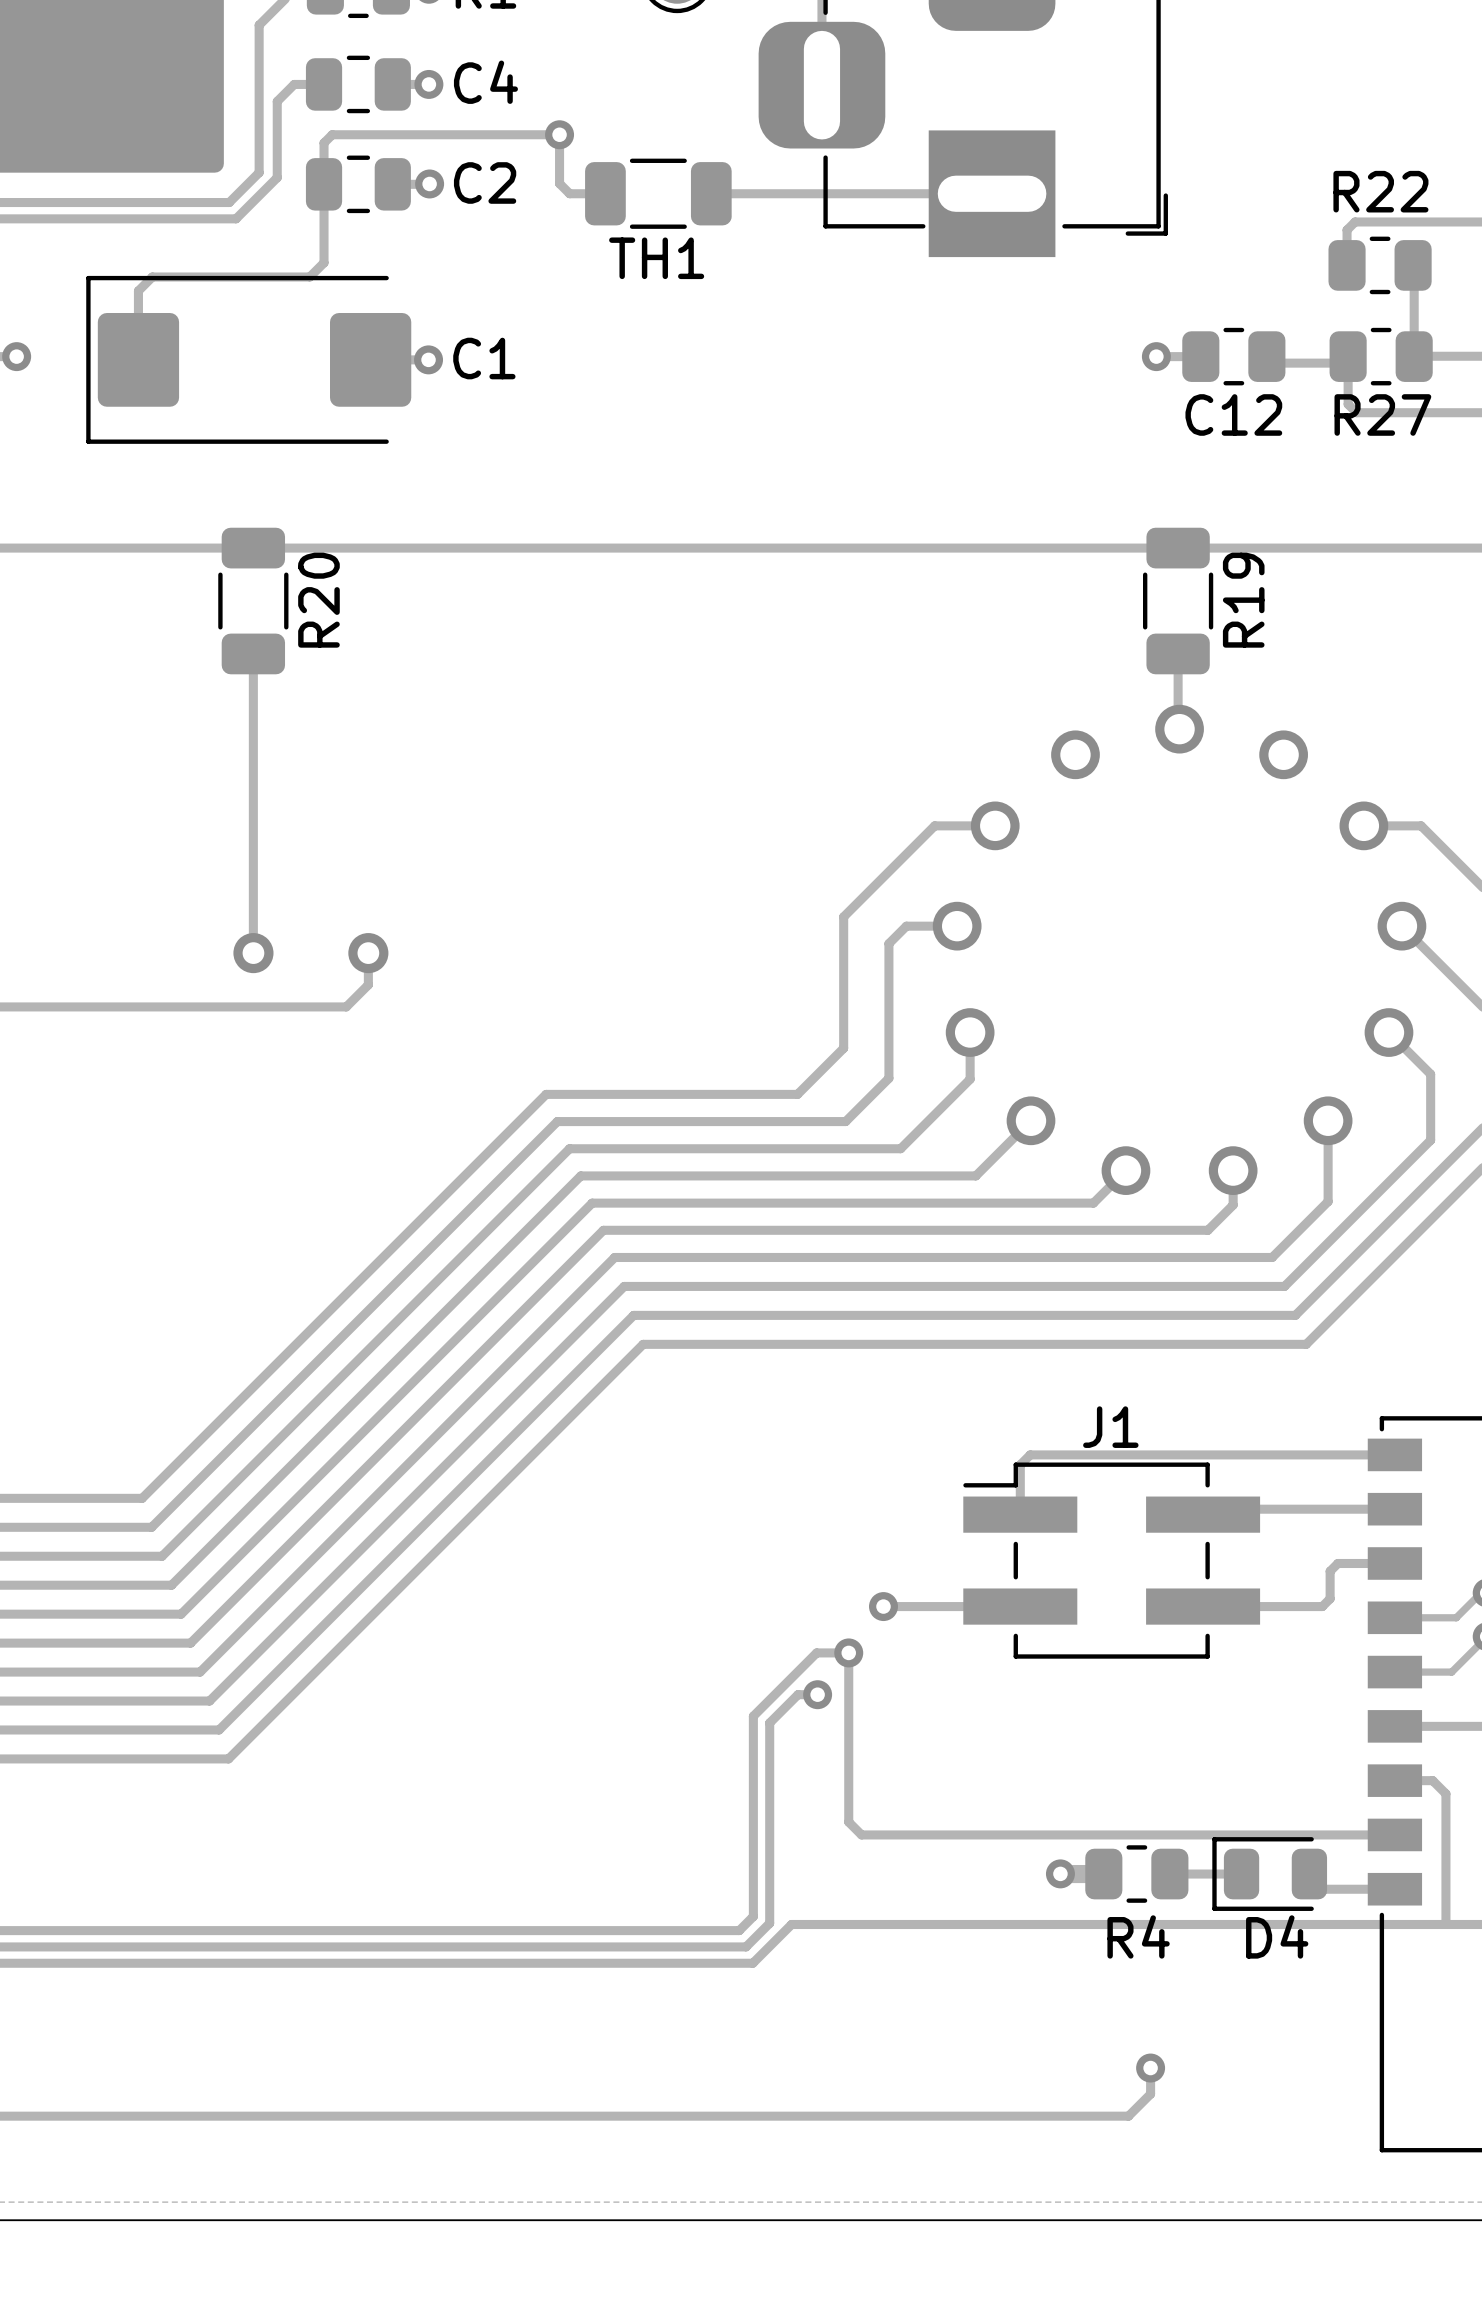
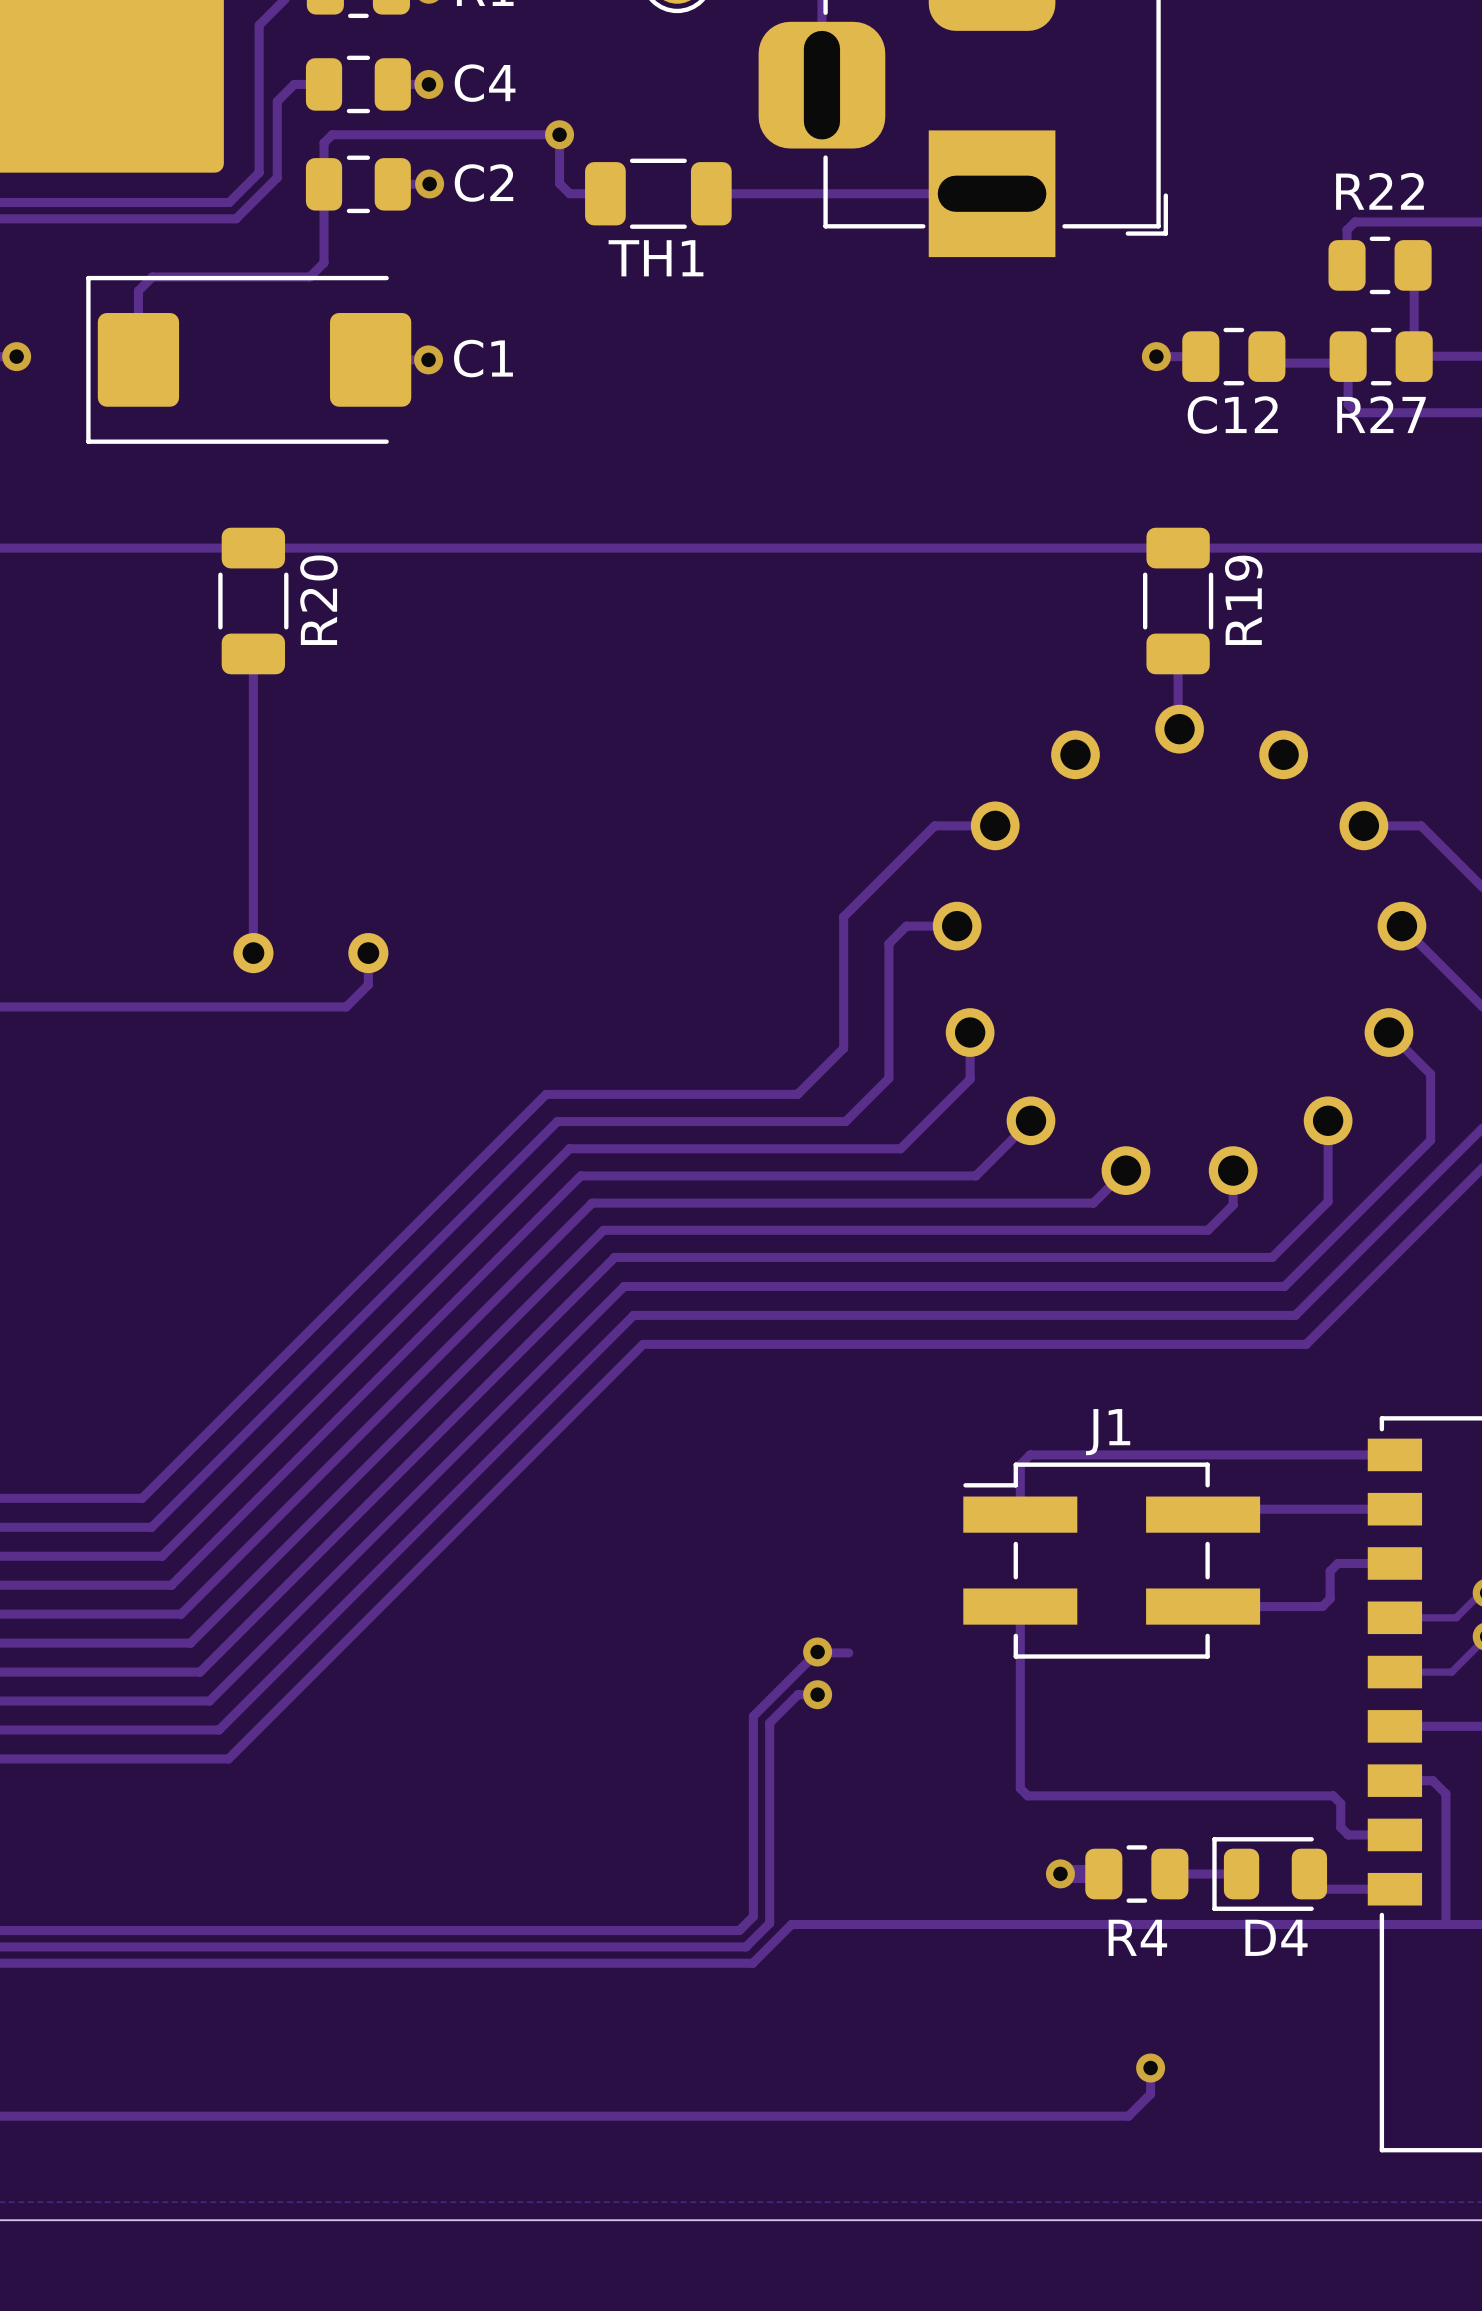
track: (883, 1606) (1020, 1606) -> none
via: (883, 1606) -> none
via position: (848, 1652) -> (817, 1651)
track: (843, 1656) (848, 1652) (848, 1822) (861, 1834) (1348, 1834) -> (1020, 1606) (1020, 1788) (1027, 1795) (1333, 1795) (1340, 1803) (1340, 1827) (1348, 1834)

